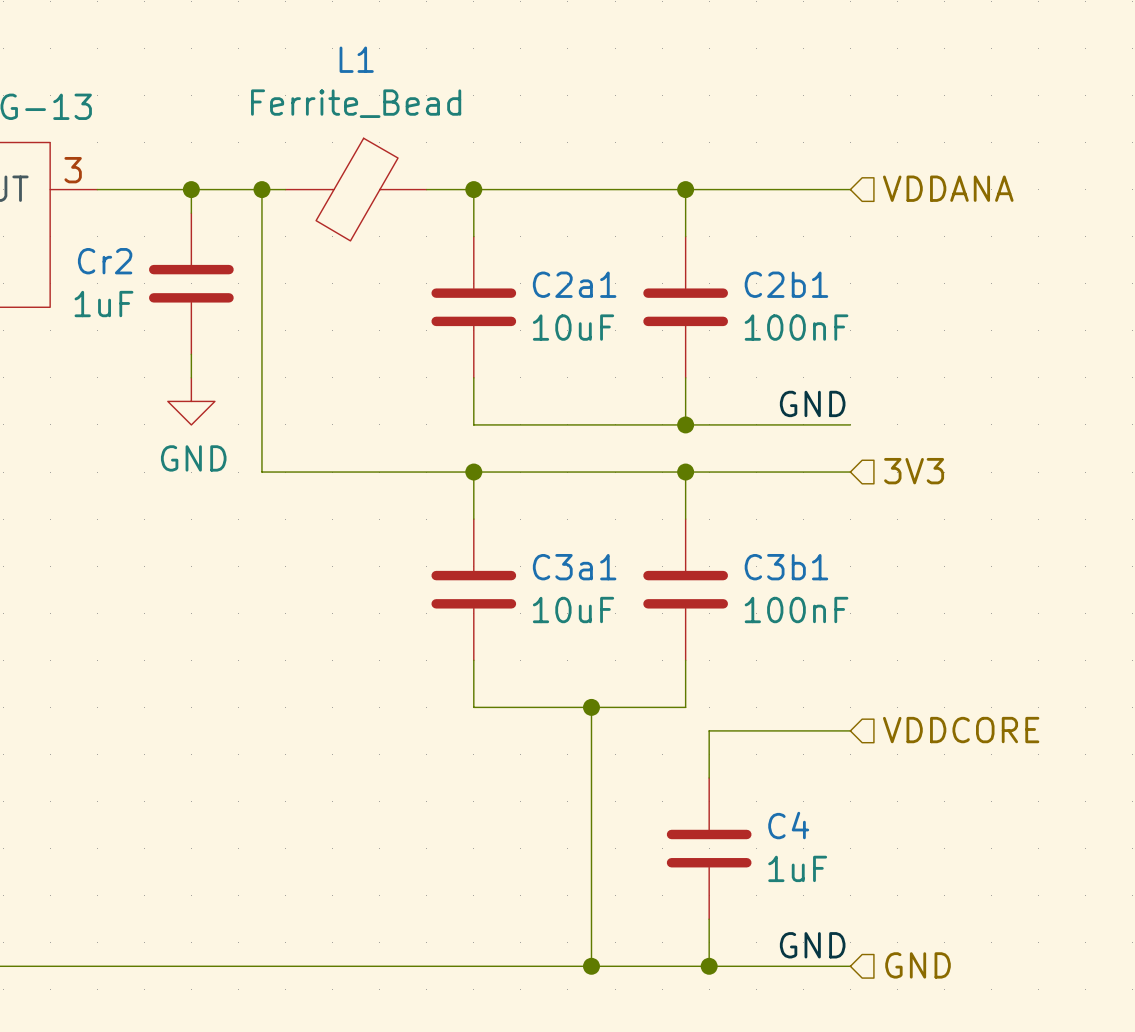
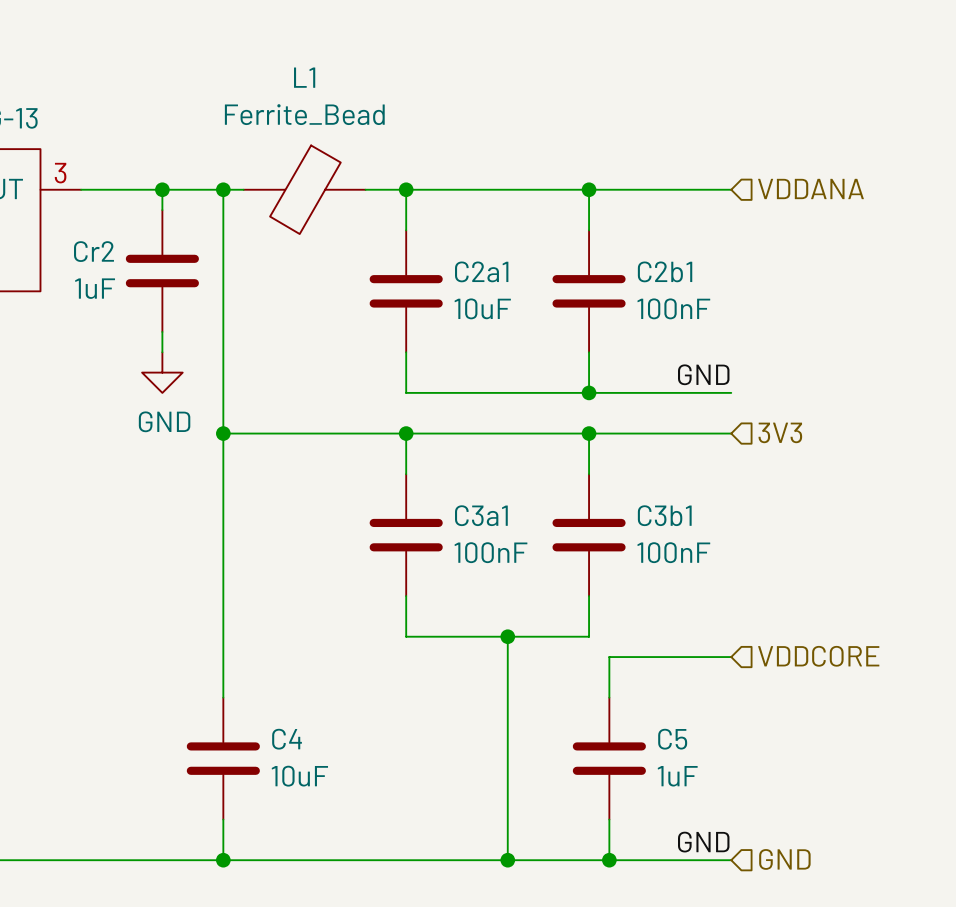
wire: none -> (223, 433) (223, 697)
junction: none -> (223, 433)
C3a1 value: 10uF (573, 610) -> 100nF (490, 552)
C4 name: C4 (788, 825) -> C5 (672, 739)
C4: none -> 10uF (223, 758)
wire: none -> (223, 819) (223, 860)
junction: none -> (223, 860)

